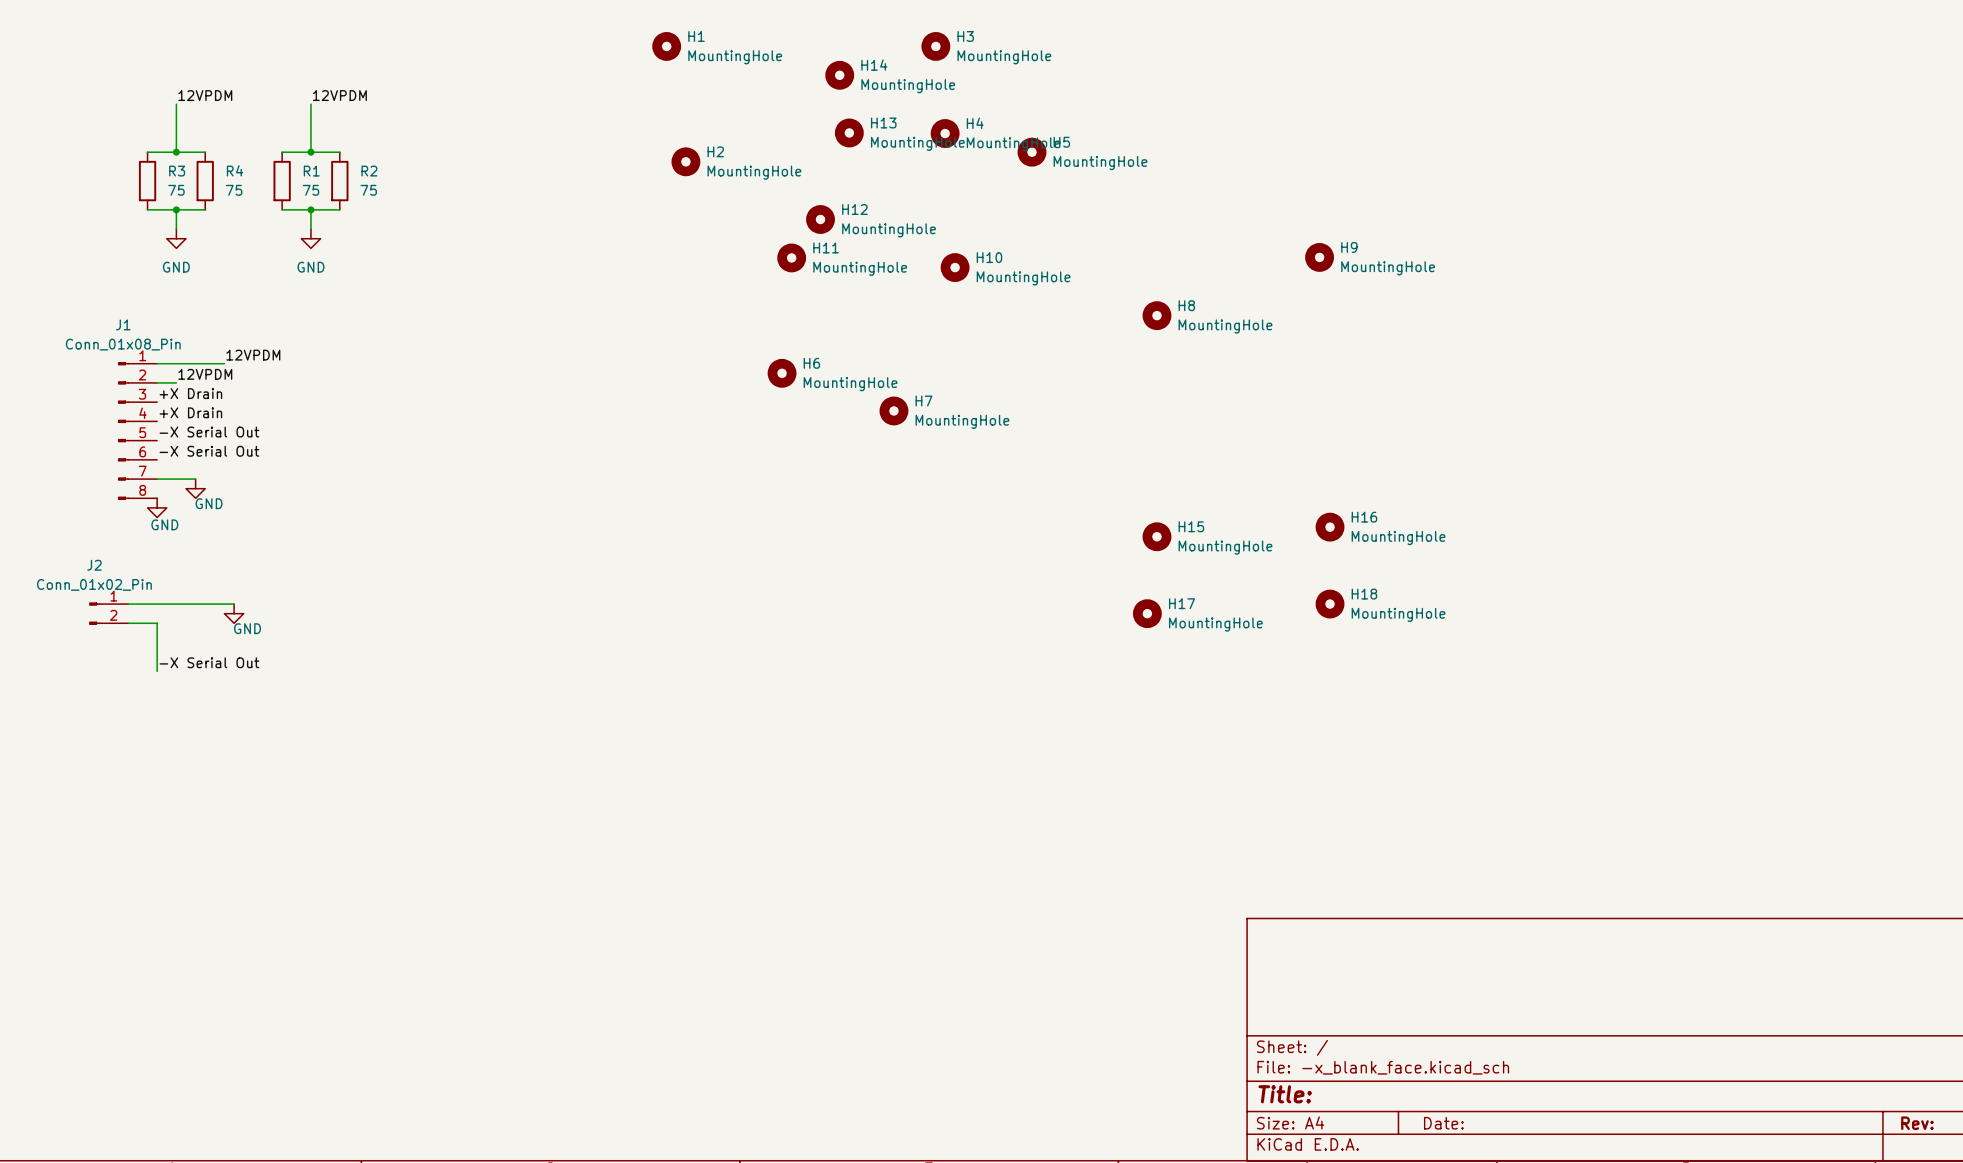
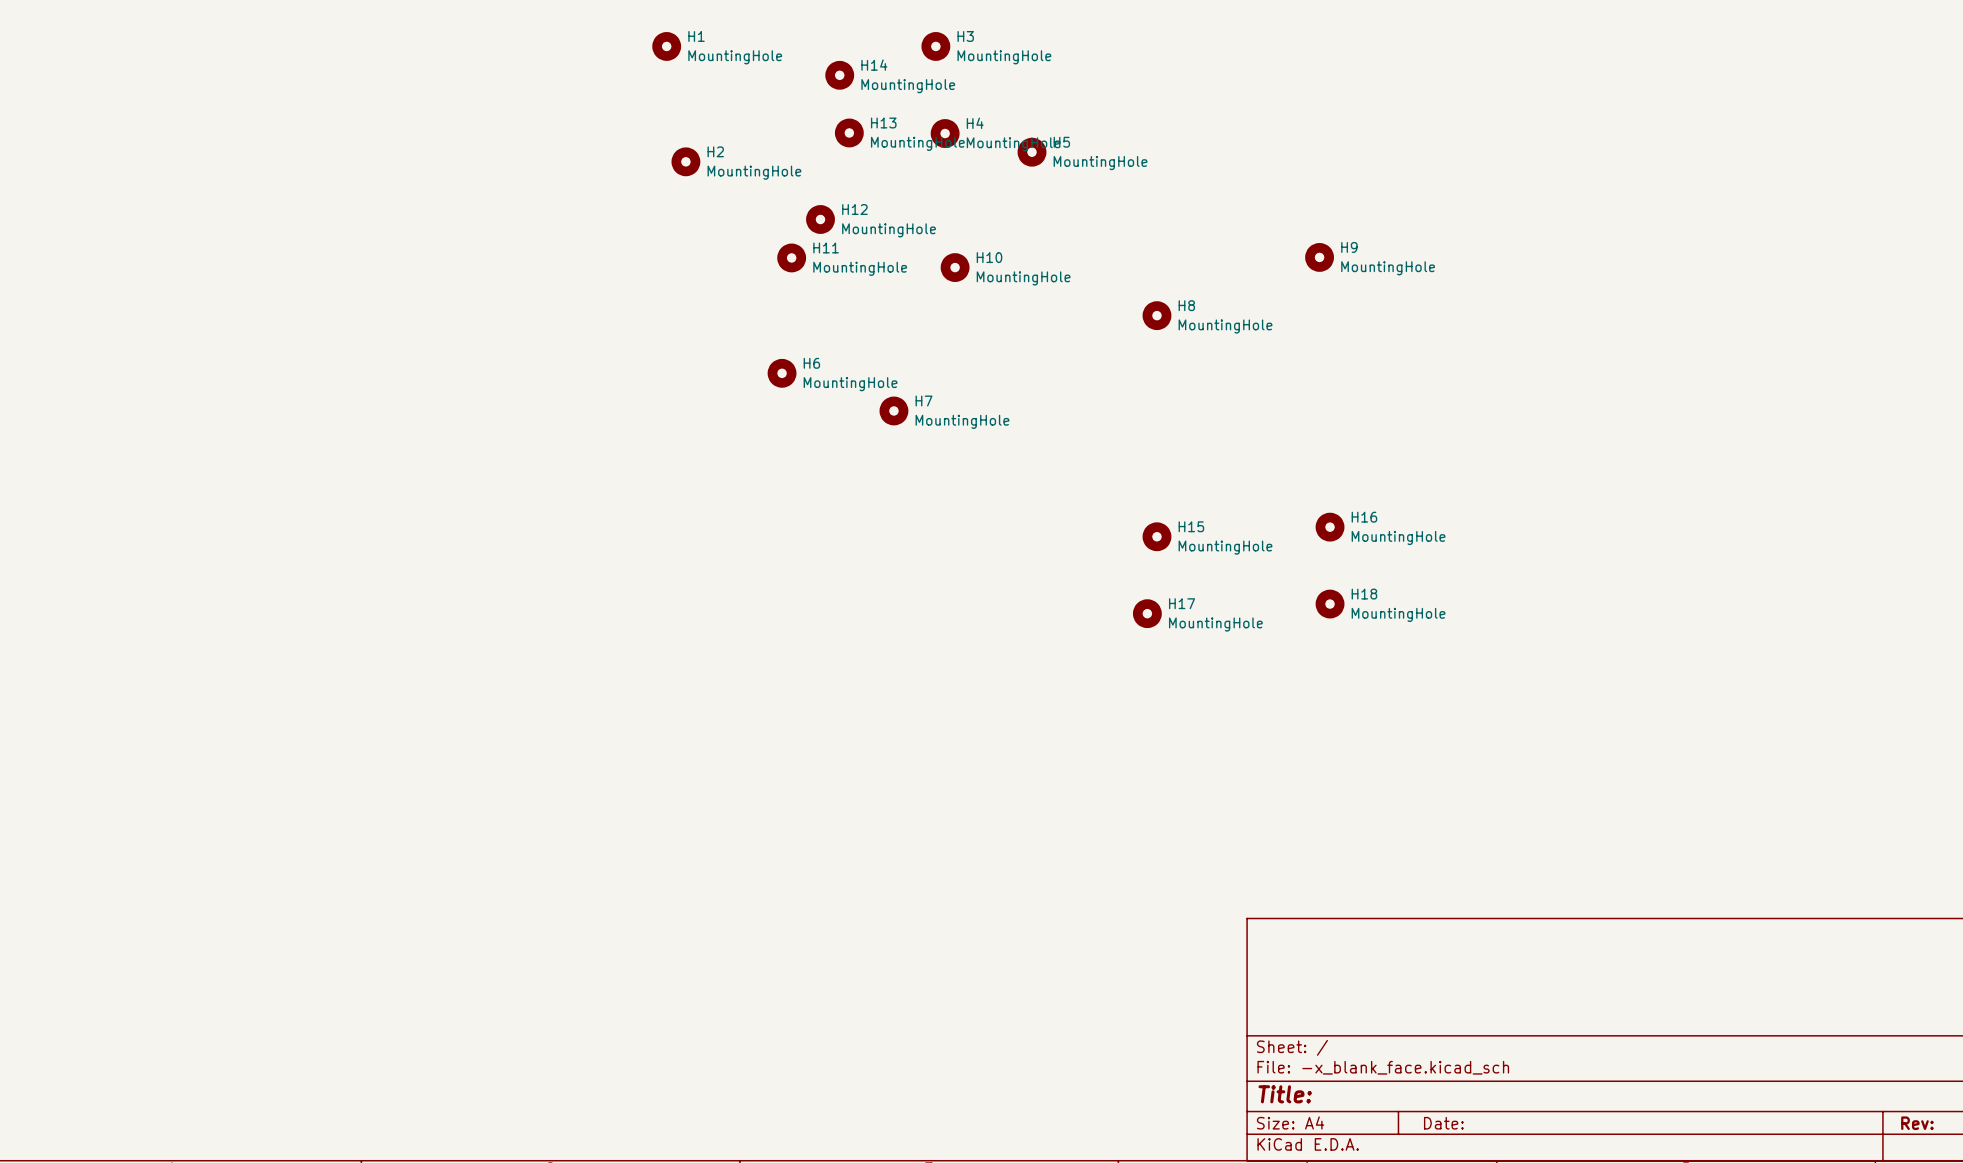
label: 12VPDM (205, 95) -> none
label: 12VPDM (339, 95) -> none
wire: (176, 104) (176, 152) -> none
wire: (310, 104) (310, 152) -> none
wire: (147, 152) (205, 152) -> none
junction: (176, 152) -> none
wire: (282, 152) (339, 152) -> none
junction: (310, 152) -> none
R3: 75 (147, 181) -> none
R4: 75 (205, 181) -> none
R1: 75 (282, 181) -> none
R2: 75 (339, 181) -> none
wire: (147, 209) (205, 209) -> none
wire: (176, 209) (176, 229) -> none
junction: (176, 209) -> none
wire: (282, 209) (339, 209) -> none
wire: (310, 209) (310, 229) -> none
junction: (310, 209) -> none
power symbol: GND (176, 238) -> none
power symbol: GND (310, 238) -> none
label: 12VPDM (253, 355) -> none
wire: (157, 363) (224, 363) -> none
label: 12VPDM (205, 374) -> none
wire: (157, 382) (176, 382) -> none
label: +X Drain (190, 393) -> none
label: +X Drain (190, 412) -> none
J1: Conn_01x08_Pin (137, 431) -> none
label: -X Serial Out (209, 432) -> none
label: -X Serial Out (209, 451) -> none
wire: (157, 479) (195, 479) -> none
power symbol: GND (195, 488) -> none
power symbol: GND (157, 507) -> none
wire: (128, 604) (234, 604) -> none
J2: Conn_01x02_Pin (108, 613) -> none
power symbol: GND (234, 613) -> none
wire: (128, 623) (157, 623) (157, 671) -> none
label: -X Serial Out (209, 662) -> none

